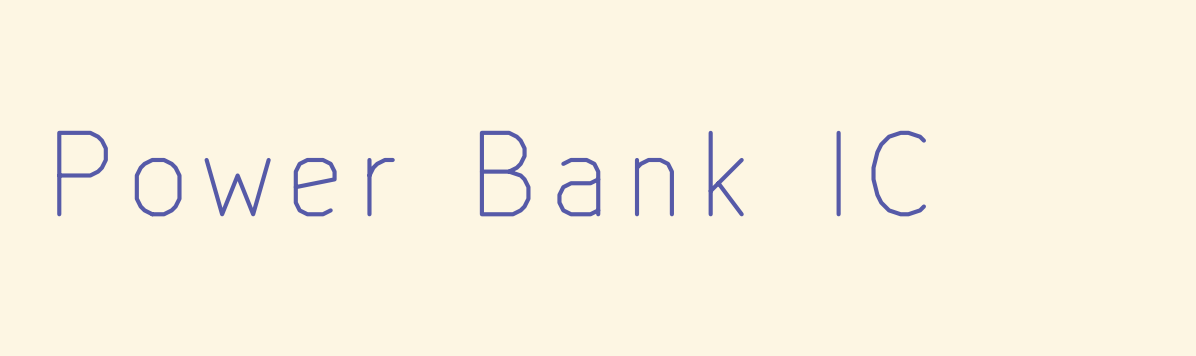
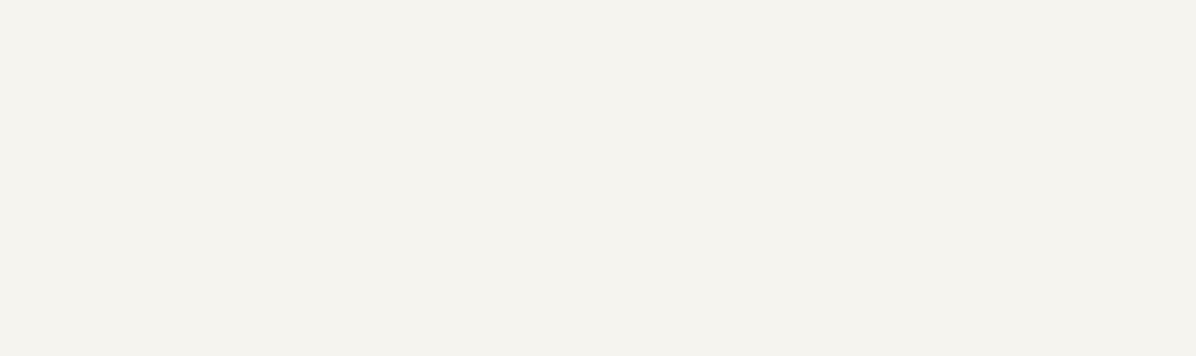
text: Power Bank IC (491, 173) -> none

